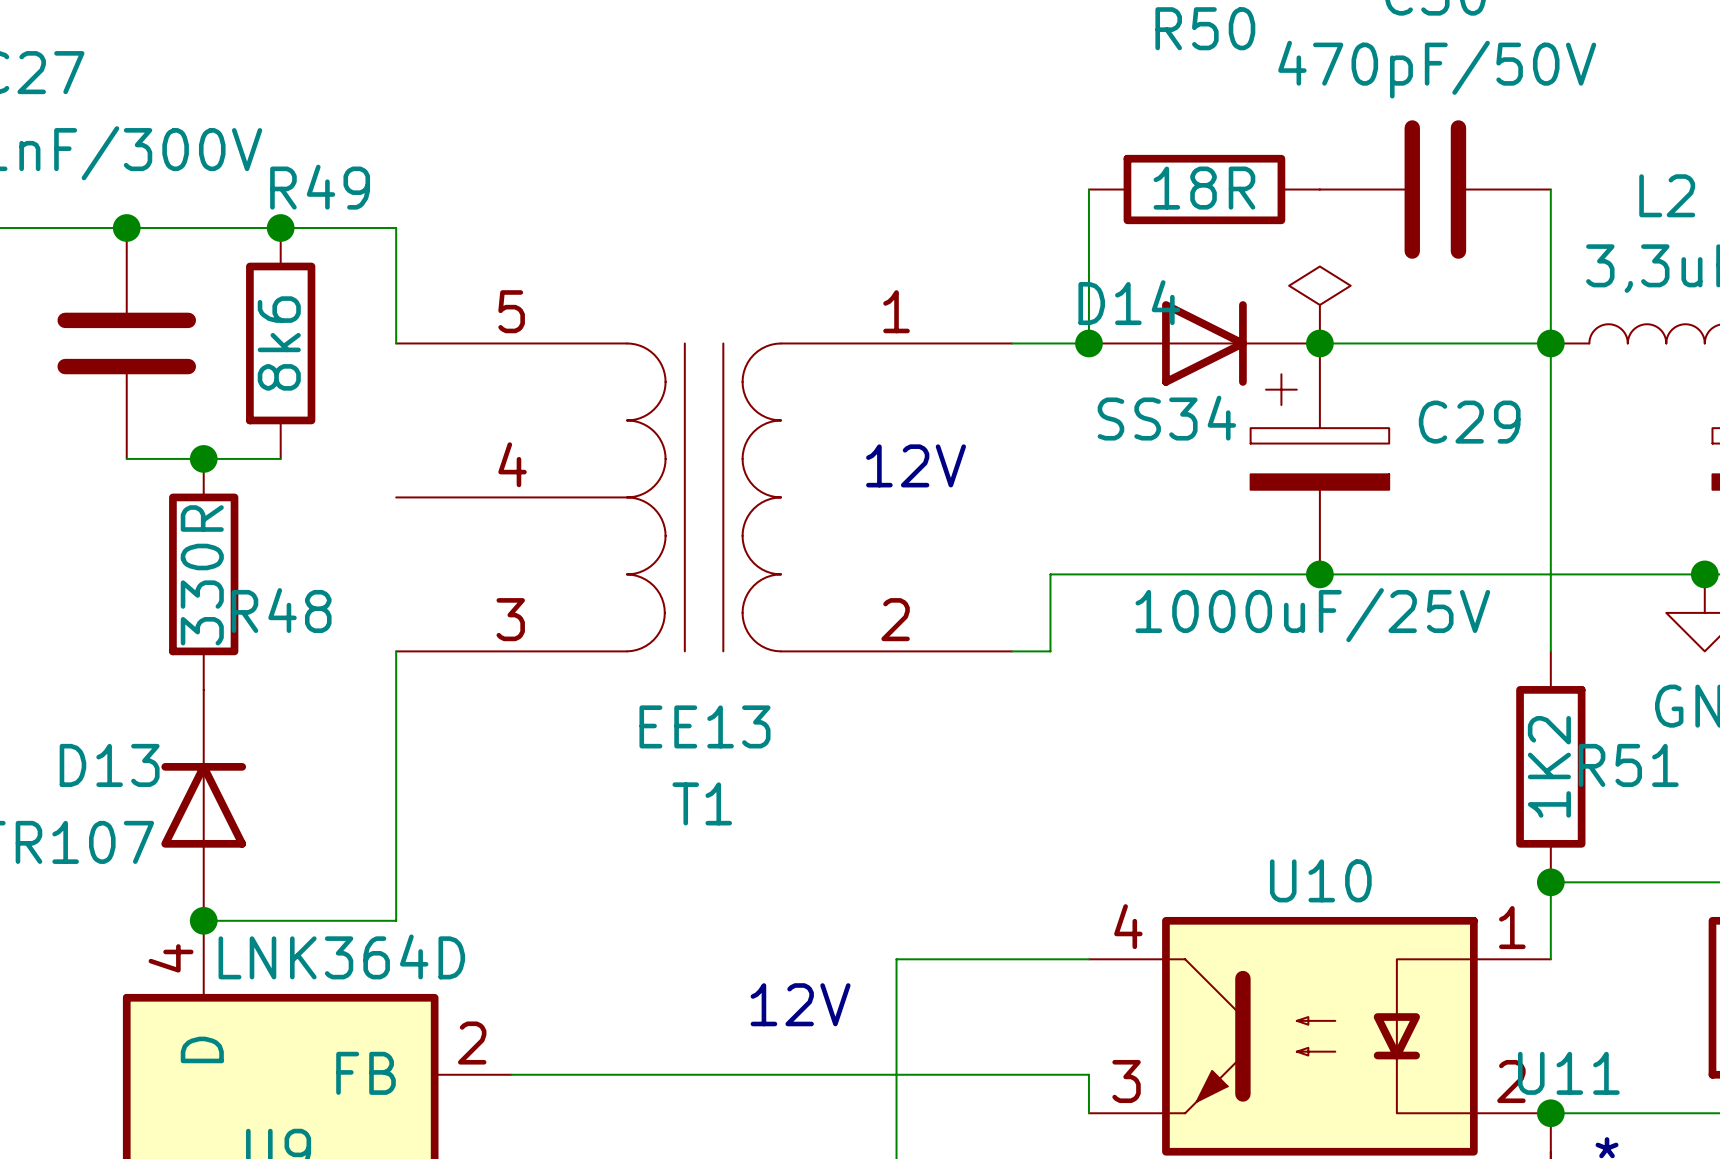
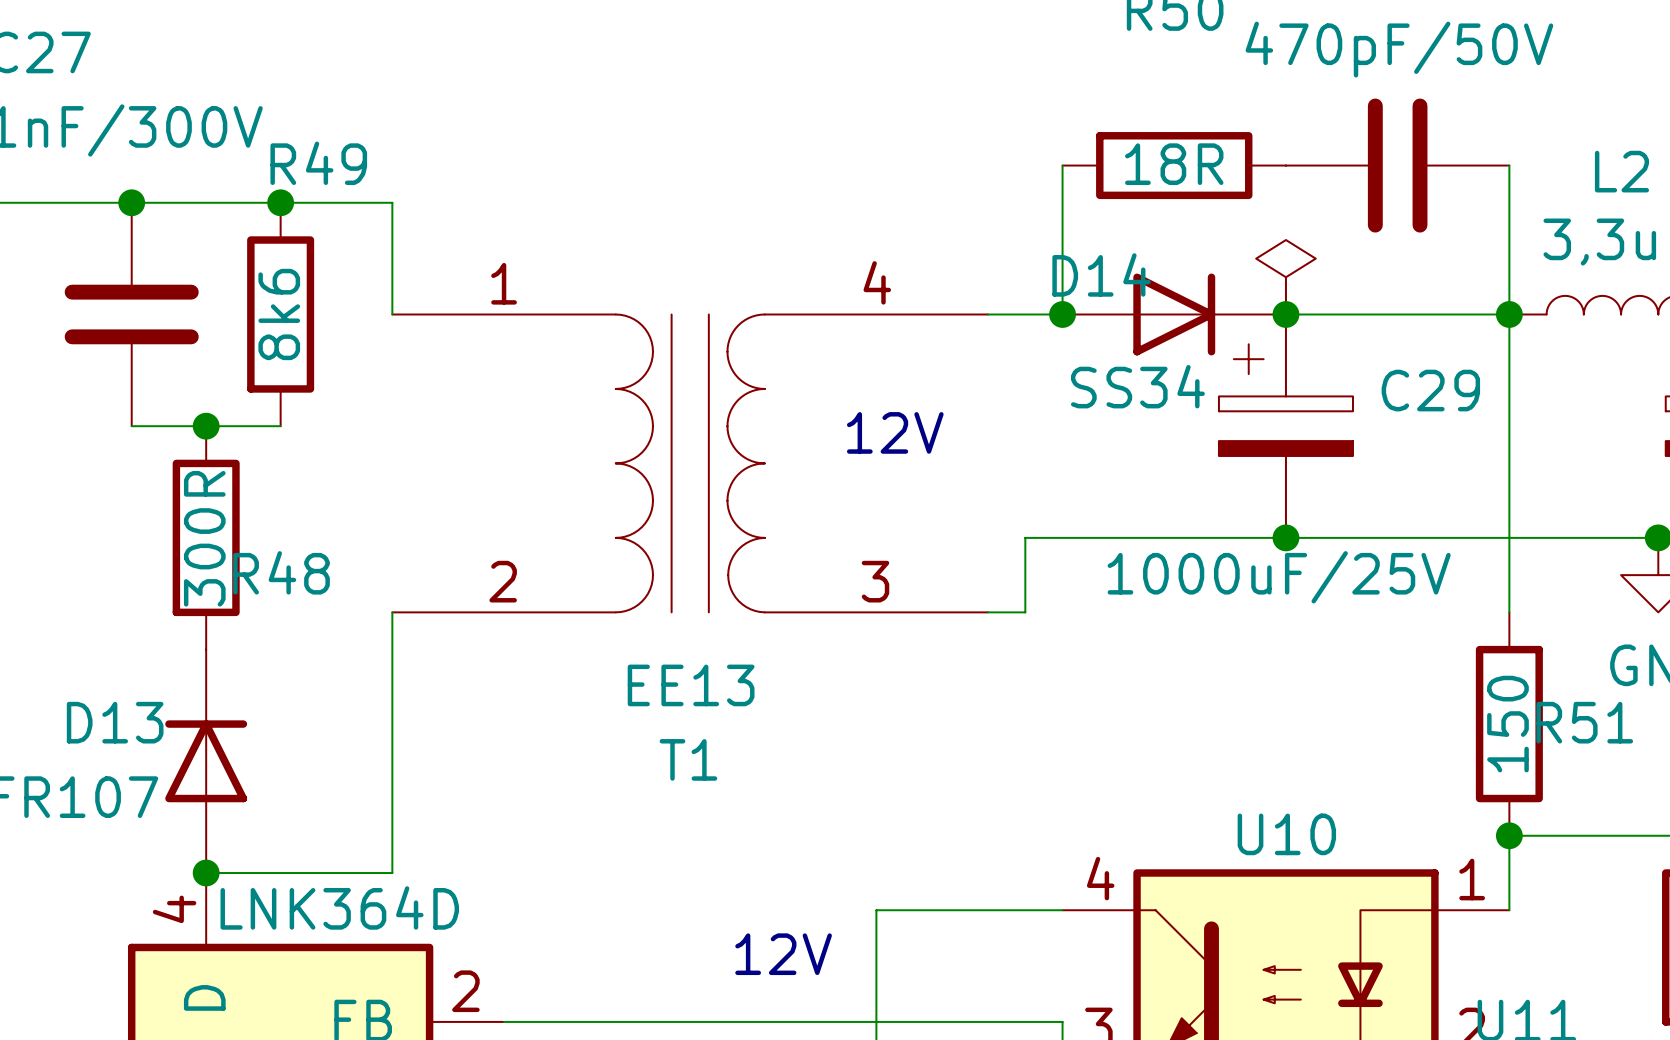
T1 symbol: [396, 343, 1012, 652] -> [392, 314, 989, 613]
R48 value: 330R (202, 575) -> 300R (204, 538)
R51 value: 1K2 (1549, 766) -> 150 (1507, 724)

